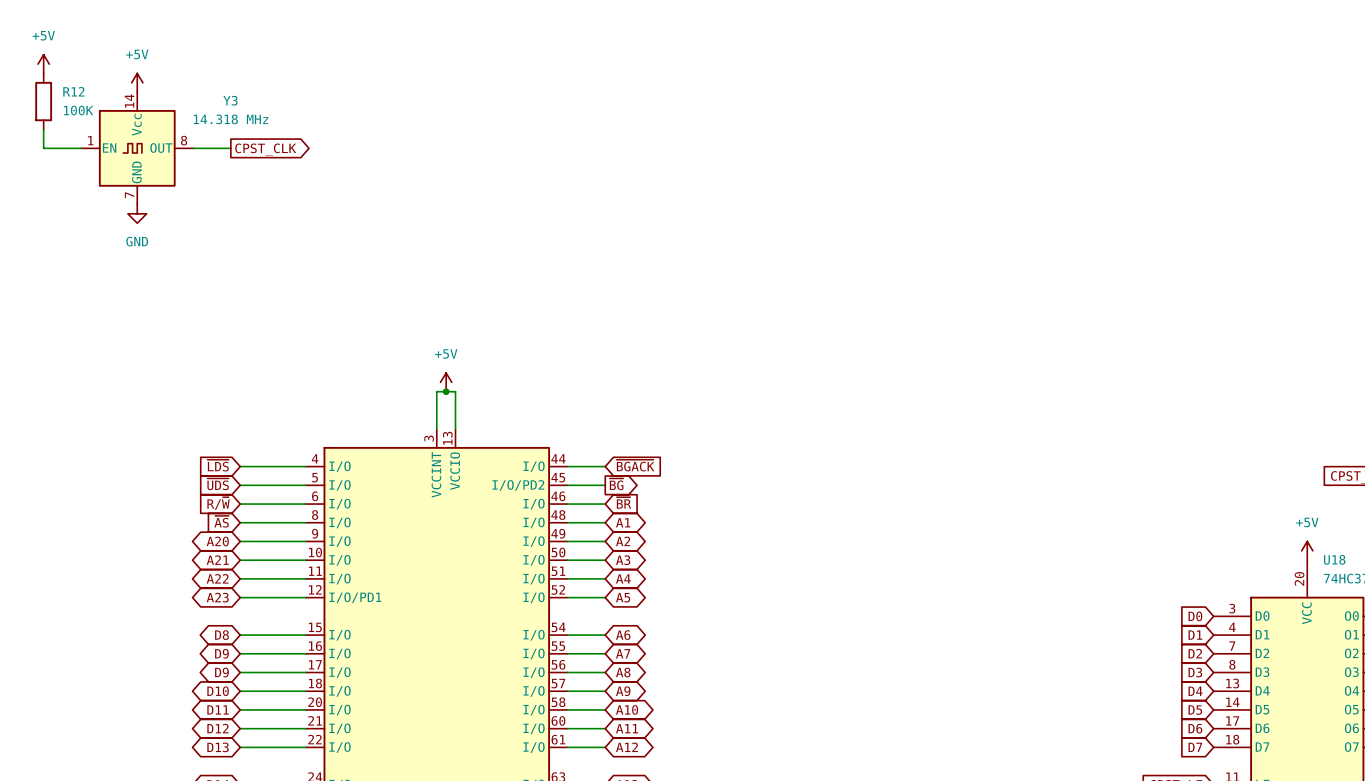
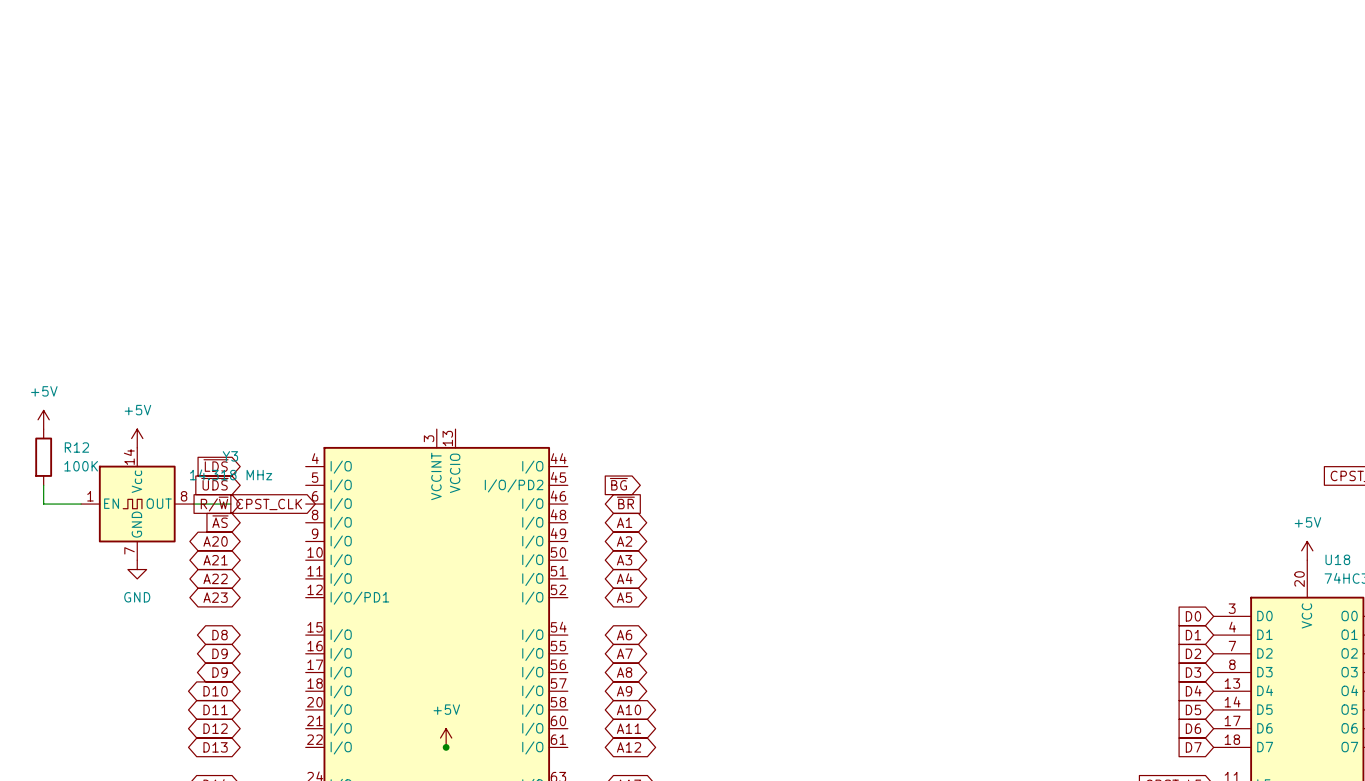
power symbol: +5V (43, 64) -> none
power symbol: +5V (137, 82) -> none
R12 position: (43, 101) -> (43, 457)
wire: (43, 129) (43, 148) (81, 148) -> none
Y3 position: (137, 148) -> (137, 504)
wire: (193, 148) (230, 148) -> none
global label: CPST_CLK (265, 149) -> none
power symbol: GND (137, 213) -> none
power symbol: +5V (446, 382) -> none
junction: (446, 391) -> none
power symbol: none -> +5V (43, 419)
wire: (436, 429) (436, 391) (455, 391) (455, 429) -> none
power symbol: none -> +5V (137, 438)
global label: ~{BGACK} (635, 465) -> none
wire: (240, 466) (305, 466) -> none
wire: (567, 466) (605, 466) -> none
wire: none -> (43, 485) (43, 504) (81, 504)
wire: (240, 485) (305, 485) -> none
wire: (567, 485) (605, 485) -> none
wire: none -> (193, 504) (230, 504)
wire: (240, 504) (305, 504) -> none
wire: (567, 504) (605, 504) -> none
global label: none -> CPST_CLK (269, 504)
wire: (240, 522) (305, 522) -> none
wire: (567, 522) (605, 522) -> none
wire: (240, 541) (305, 541) -> none
wire: (567, 541) (605, 541) -> none
wire: (240, 560) (305, 560) -> none
wire: (567, 560) (605, 560) -> none
power symbol: none -> GND (137, 569)
wire: (240, 578) (305, 578) -> none
wire: (567, 578) (605, 578) -> none
wire: (240, 597) (305, 597) -> none
wire: (567, 597) (605, 597) -> none
wire: (240, 635) (305, 635) -> none
wire: (567, 635) (605, 635) -> none
wire: (240, 653) (305, 653) -> none
wire: (567, 653) (605, 653) -> none
wire: (240, 672) (305, 672) -> none
wire: (567, 672) (605, 672) -> none
wire: (240, 691) (305, 691) -> none
wire: (567, 691) (605, 691) -> none
wire: (240, 709) (305, 709) -> none
wire: (567, 709) (605, 709) -> none
wire: (240, 728) (305, 728) -> none
wire: (567, 728) (605, 728) -> none
power symbol: none -> +5V (446, 738)
wire: (240, 747) (305, 747) -> none
junction: none -> (446, 747)
wire: (567, 747) (605, 747) -> none

